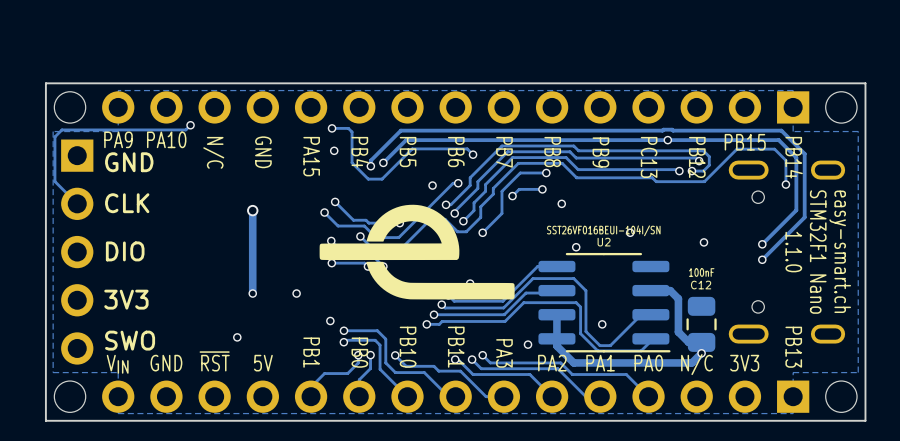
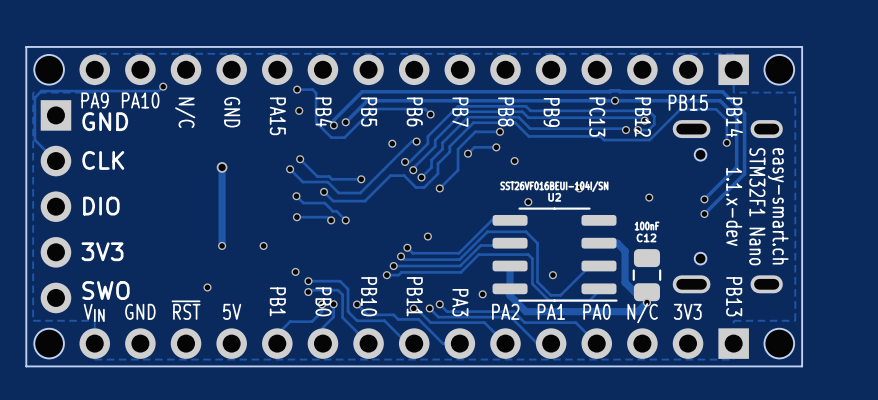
drawing: [319, 204, 515, 300] -> none
text: 1.1.0 (793, 252) -> 1.1.x-dev (734, 206)

